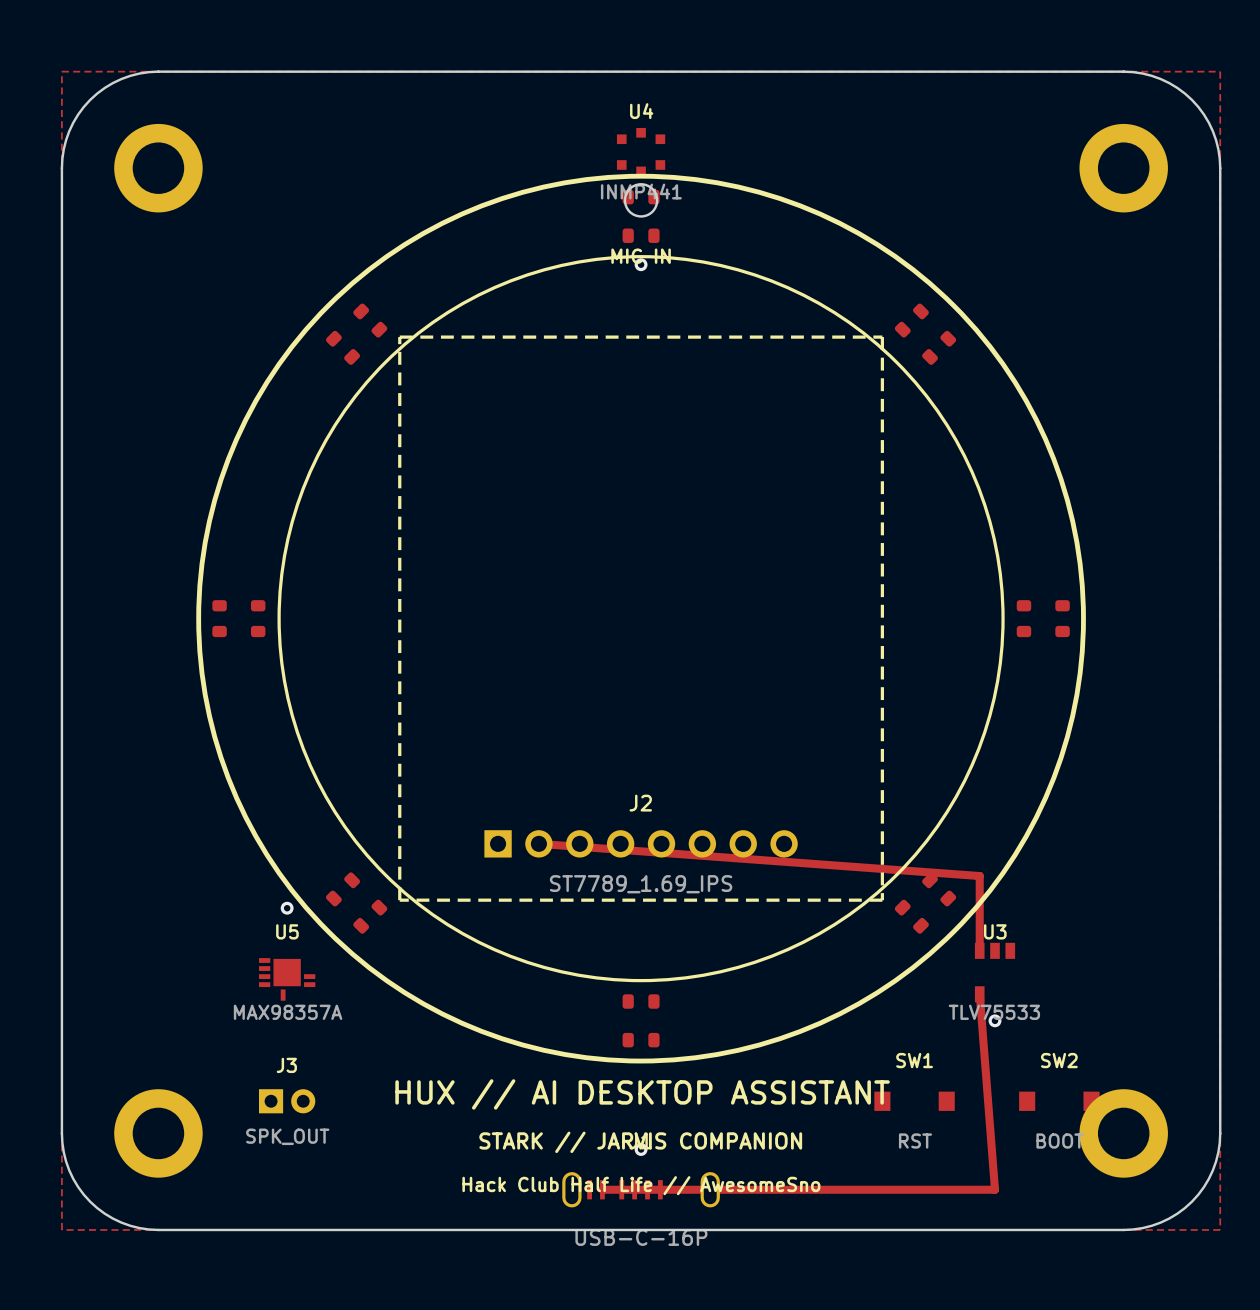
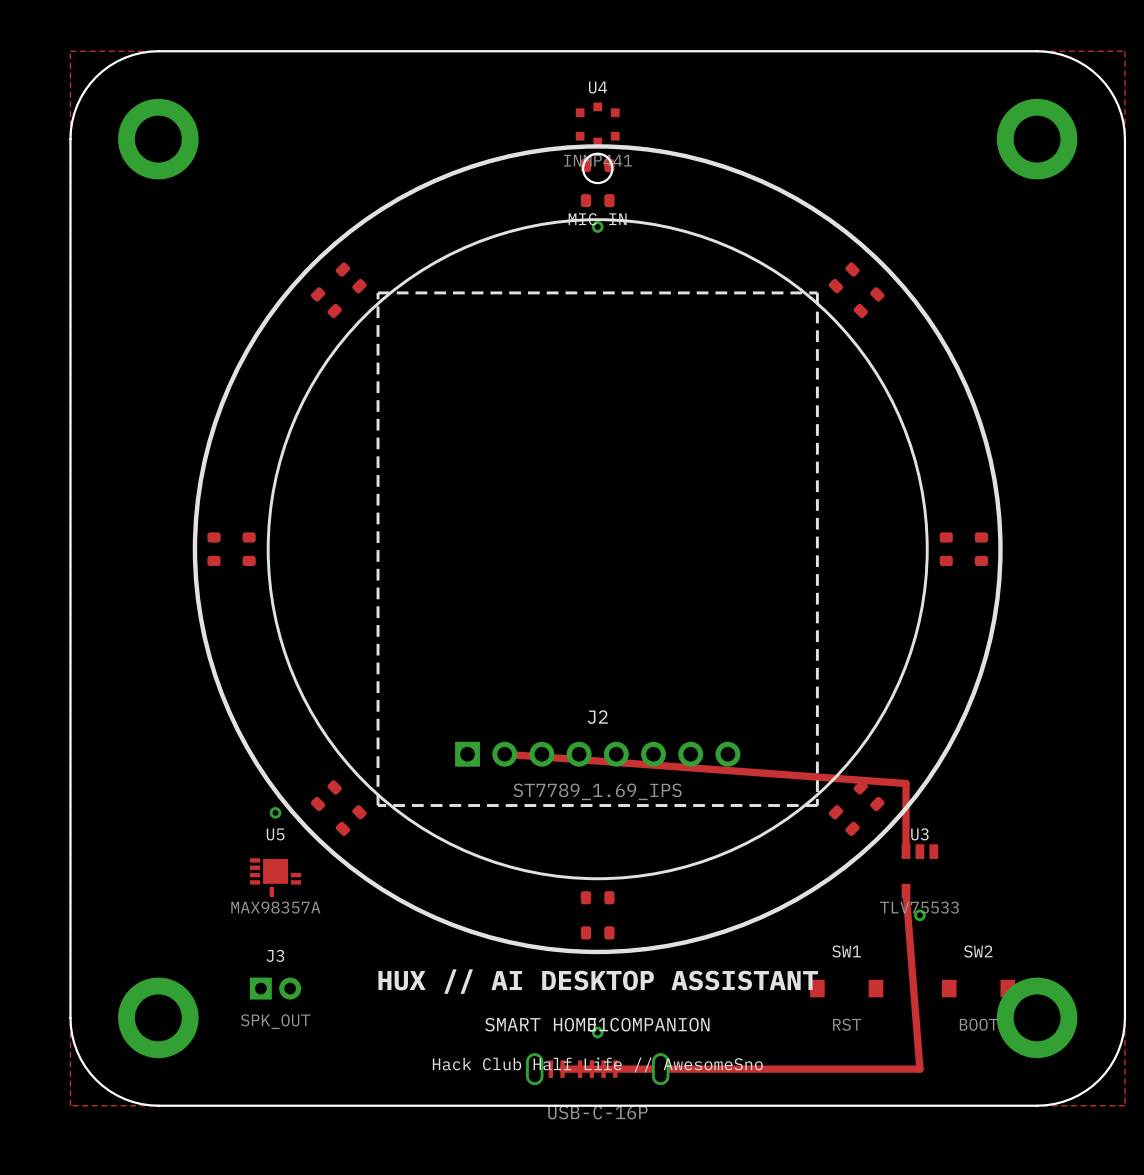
text: STARK // JARVIS COMPANION (640, 1142) -> SMART HOME COMPANION (597, 1024)

